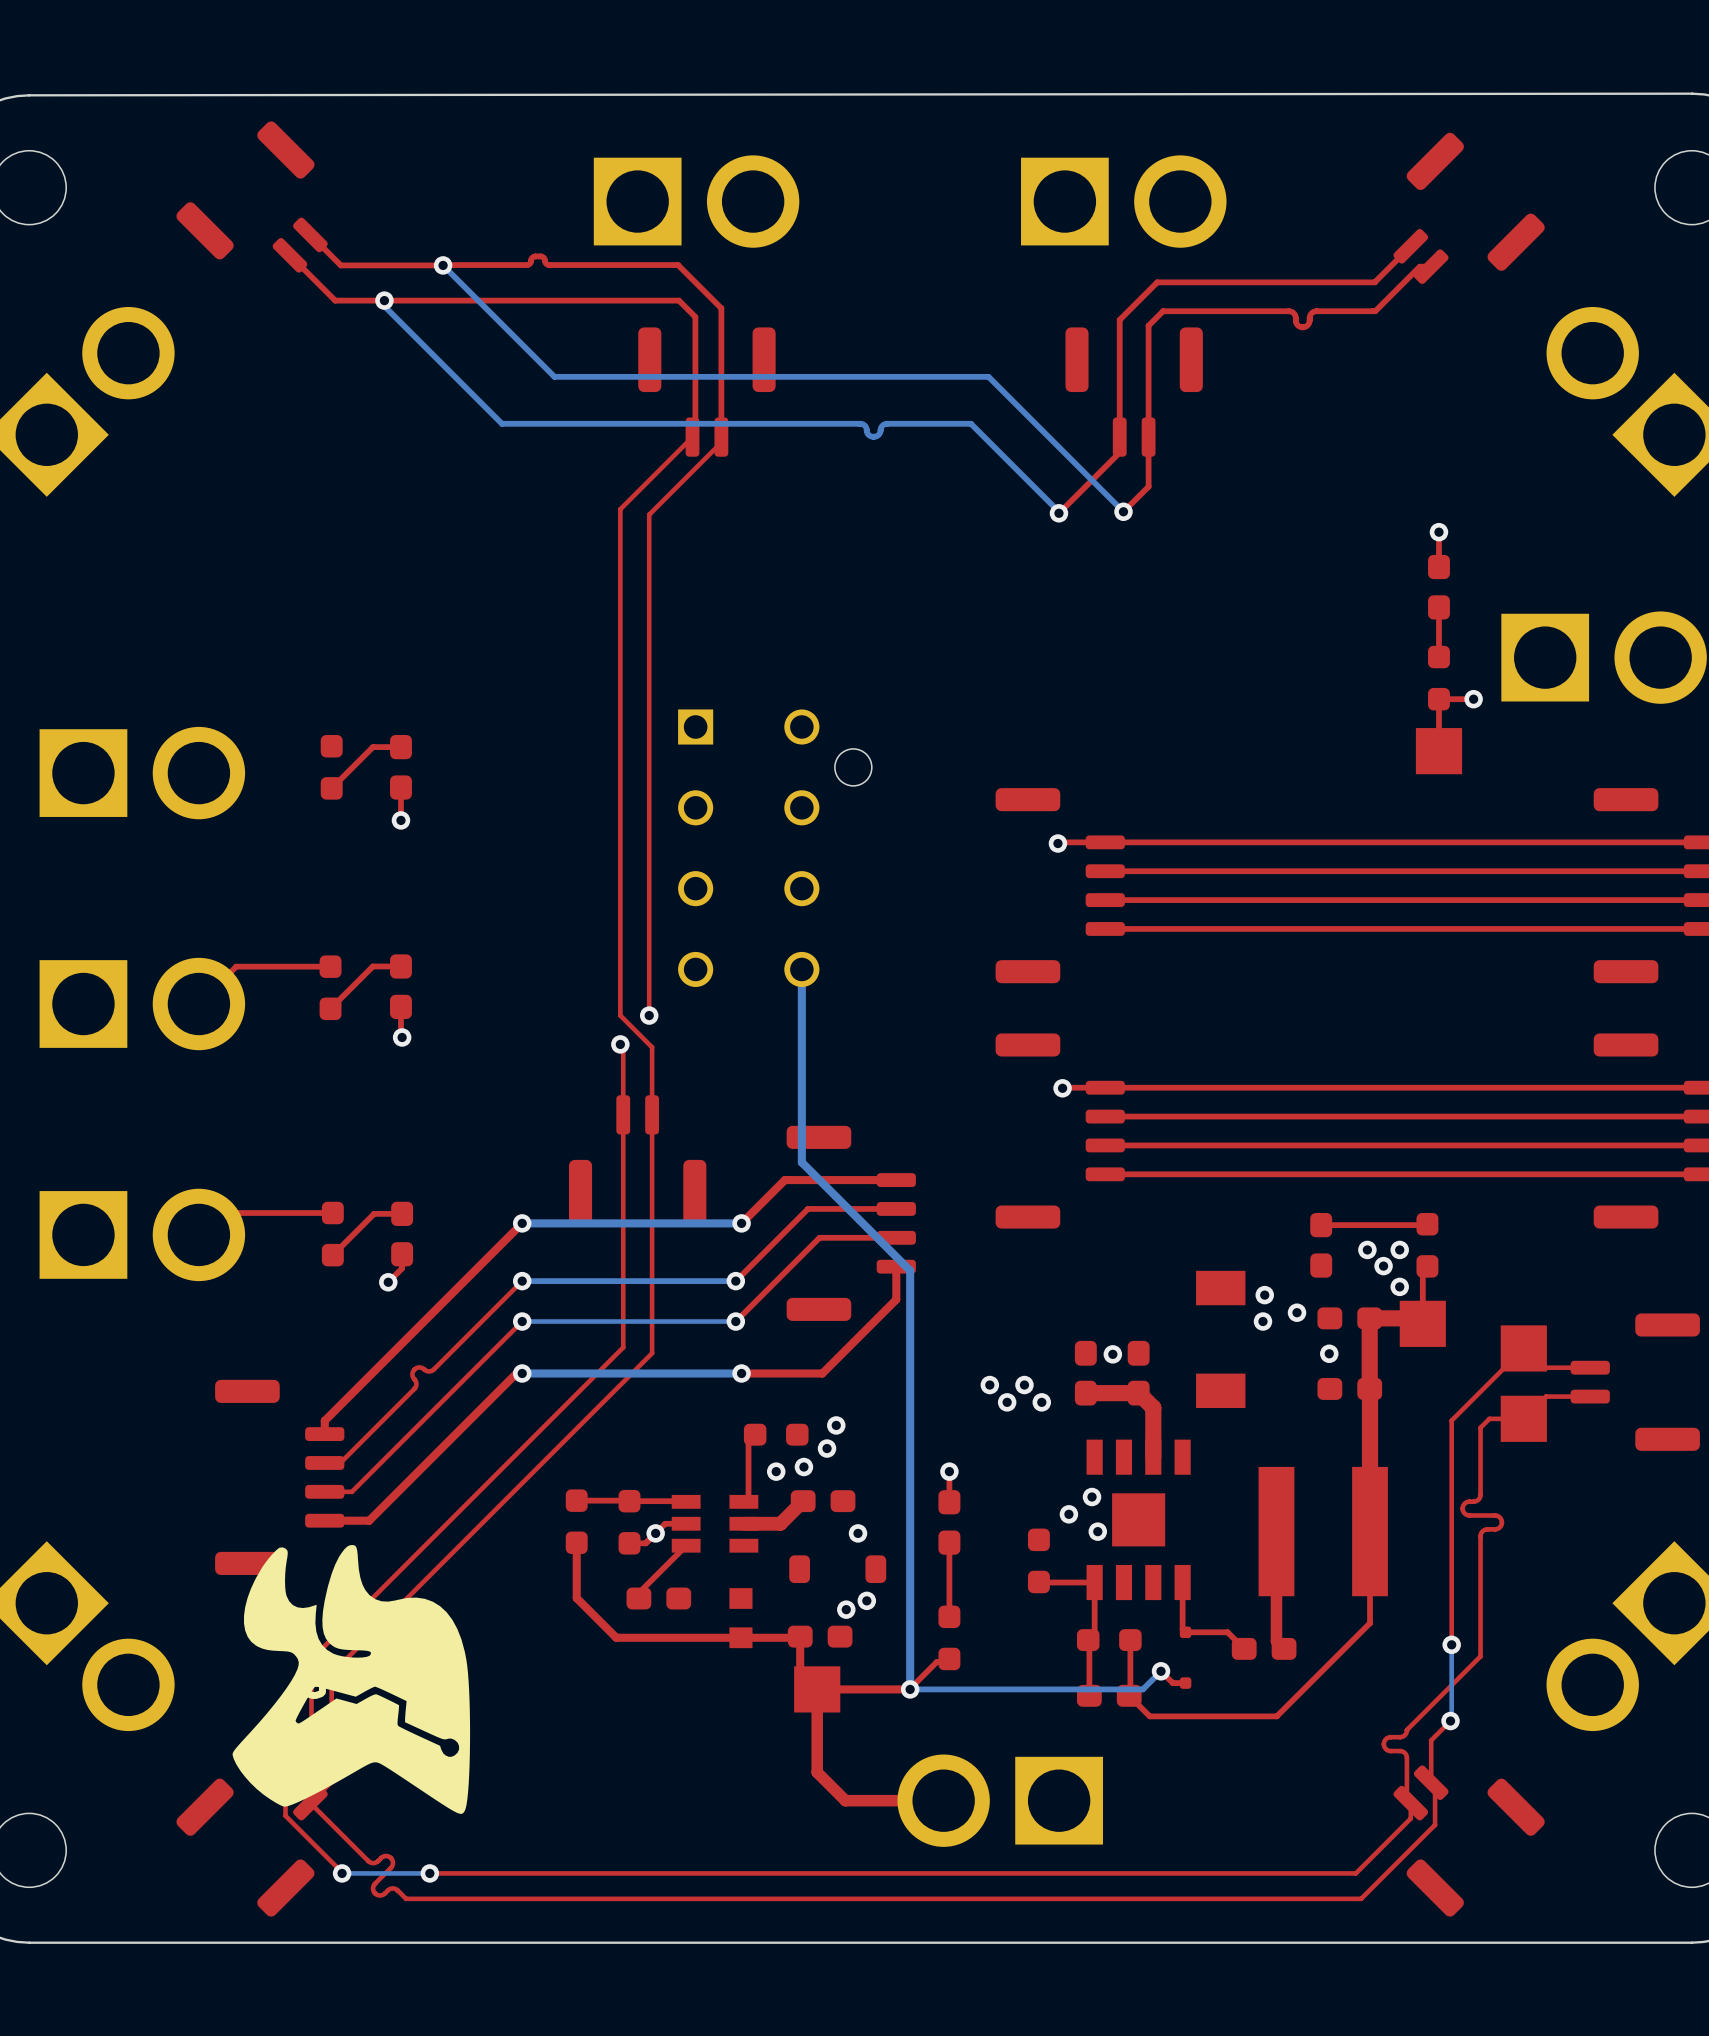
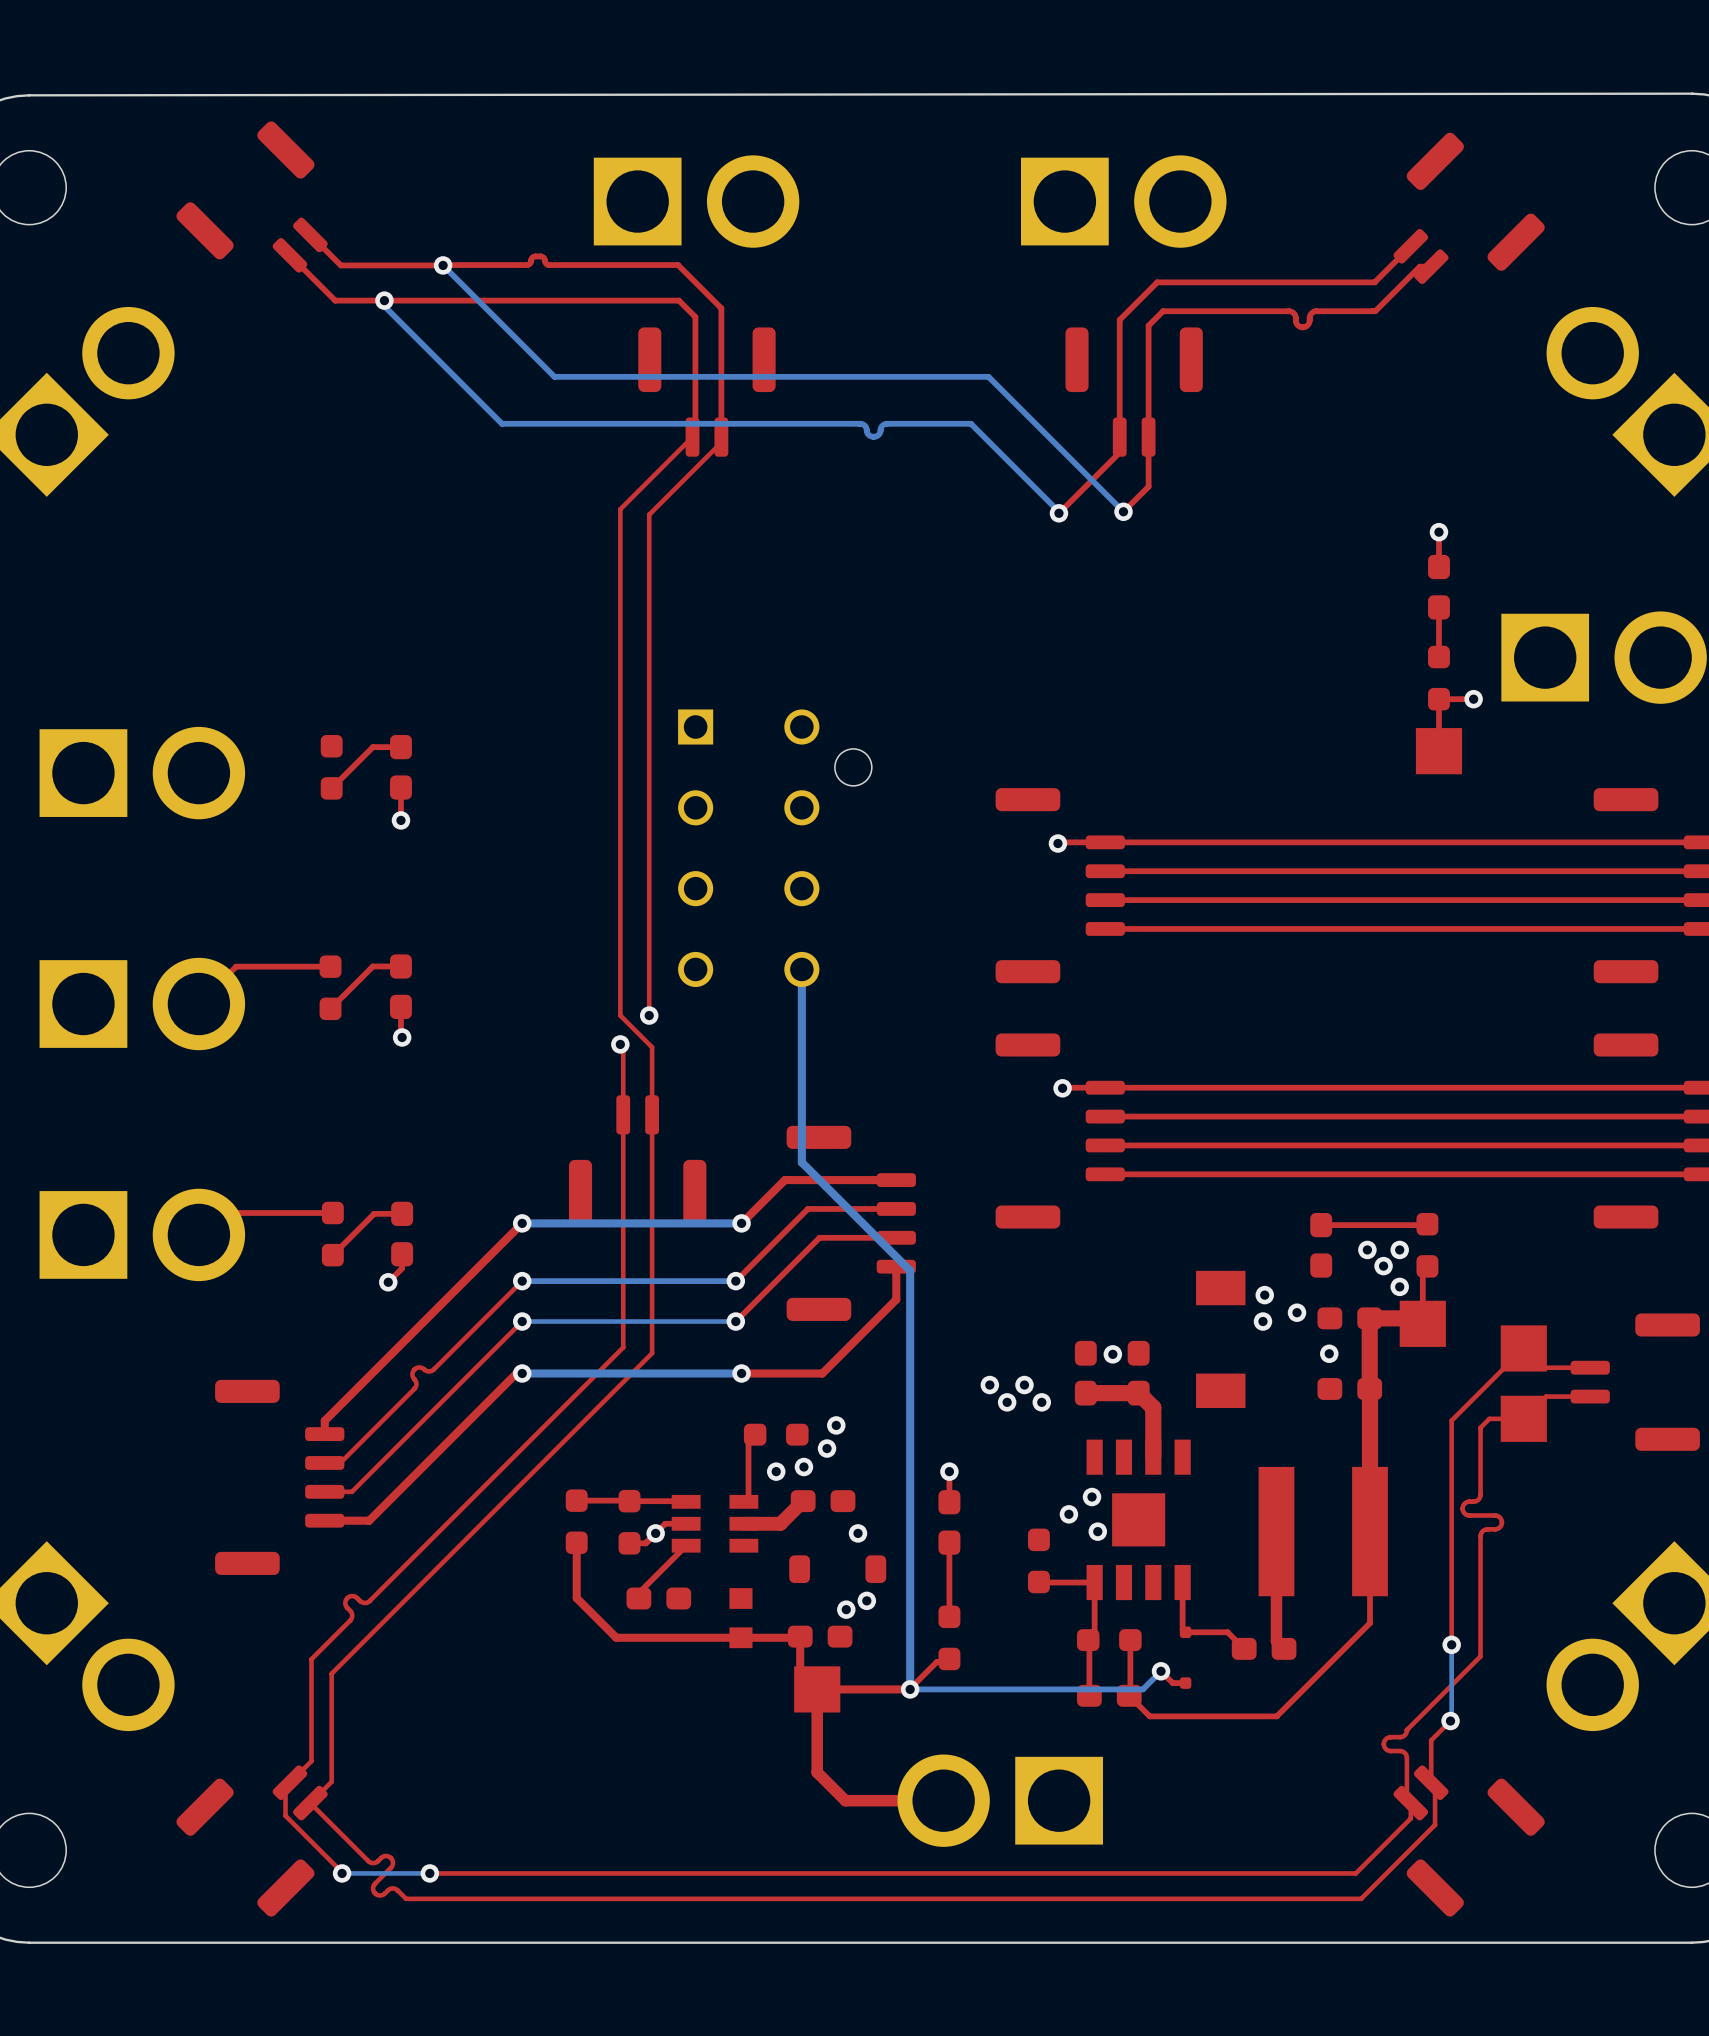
part: (351, 1679) -> none

